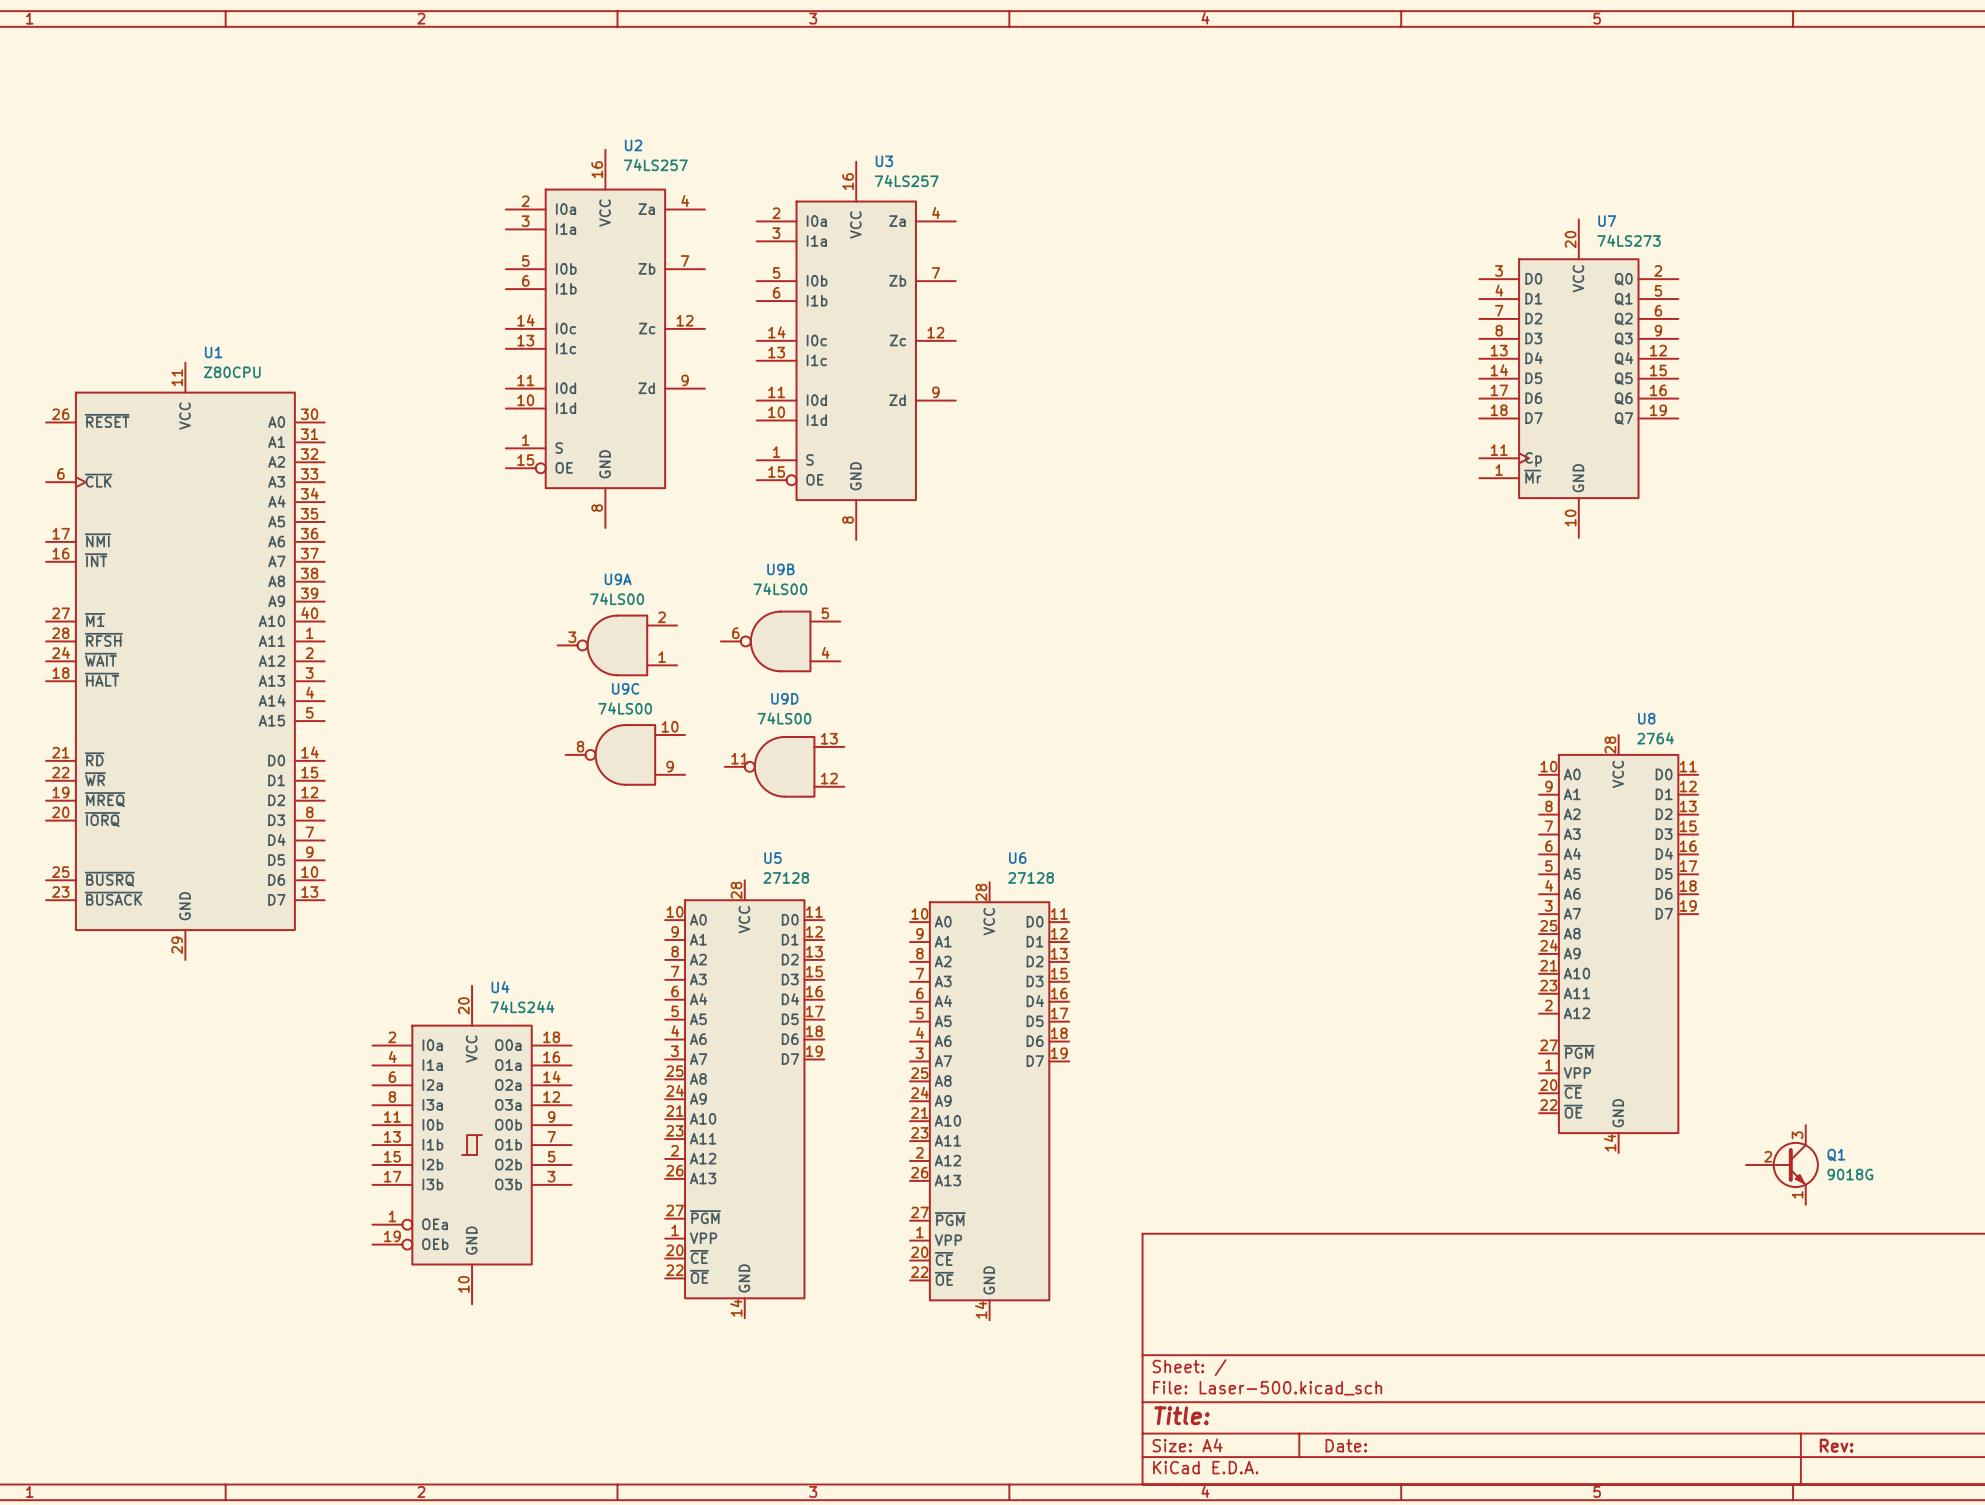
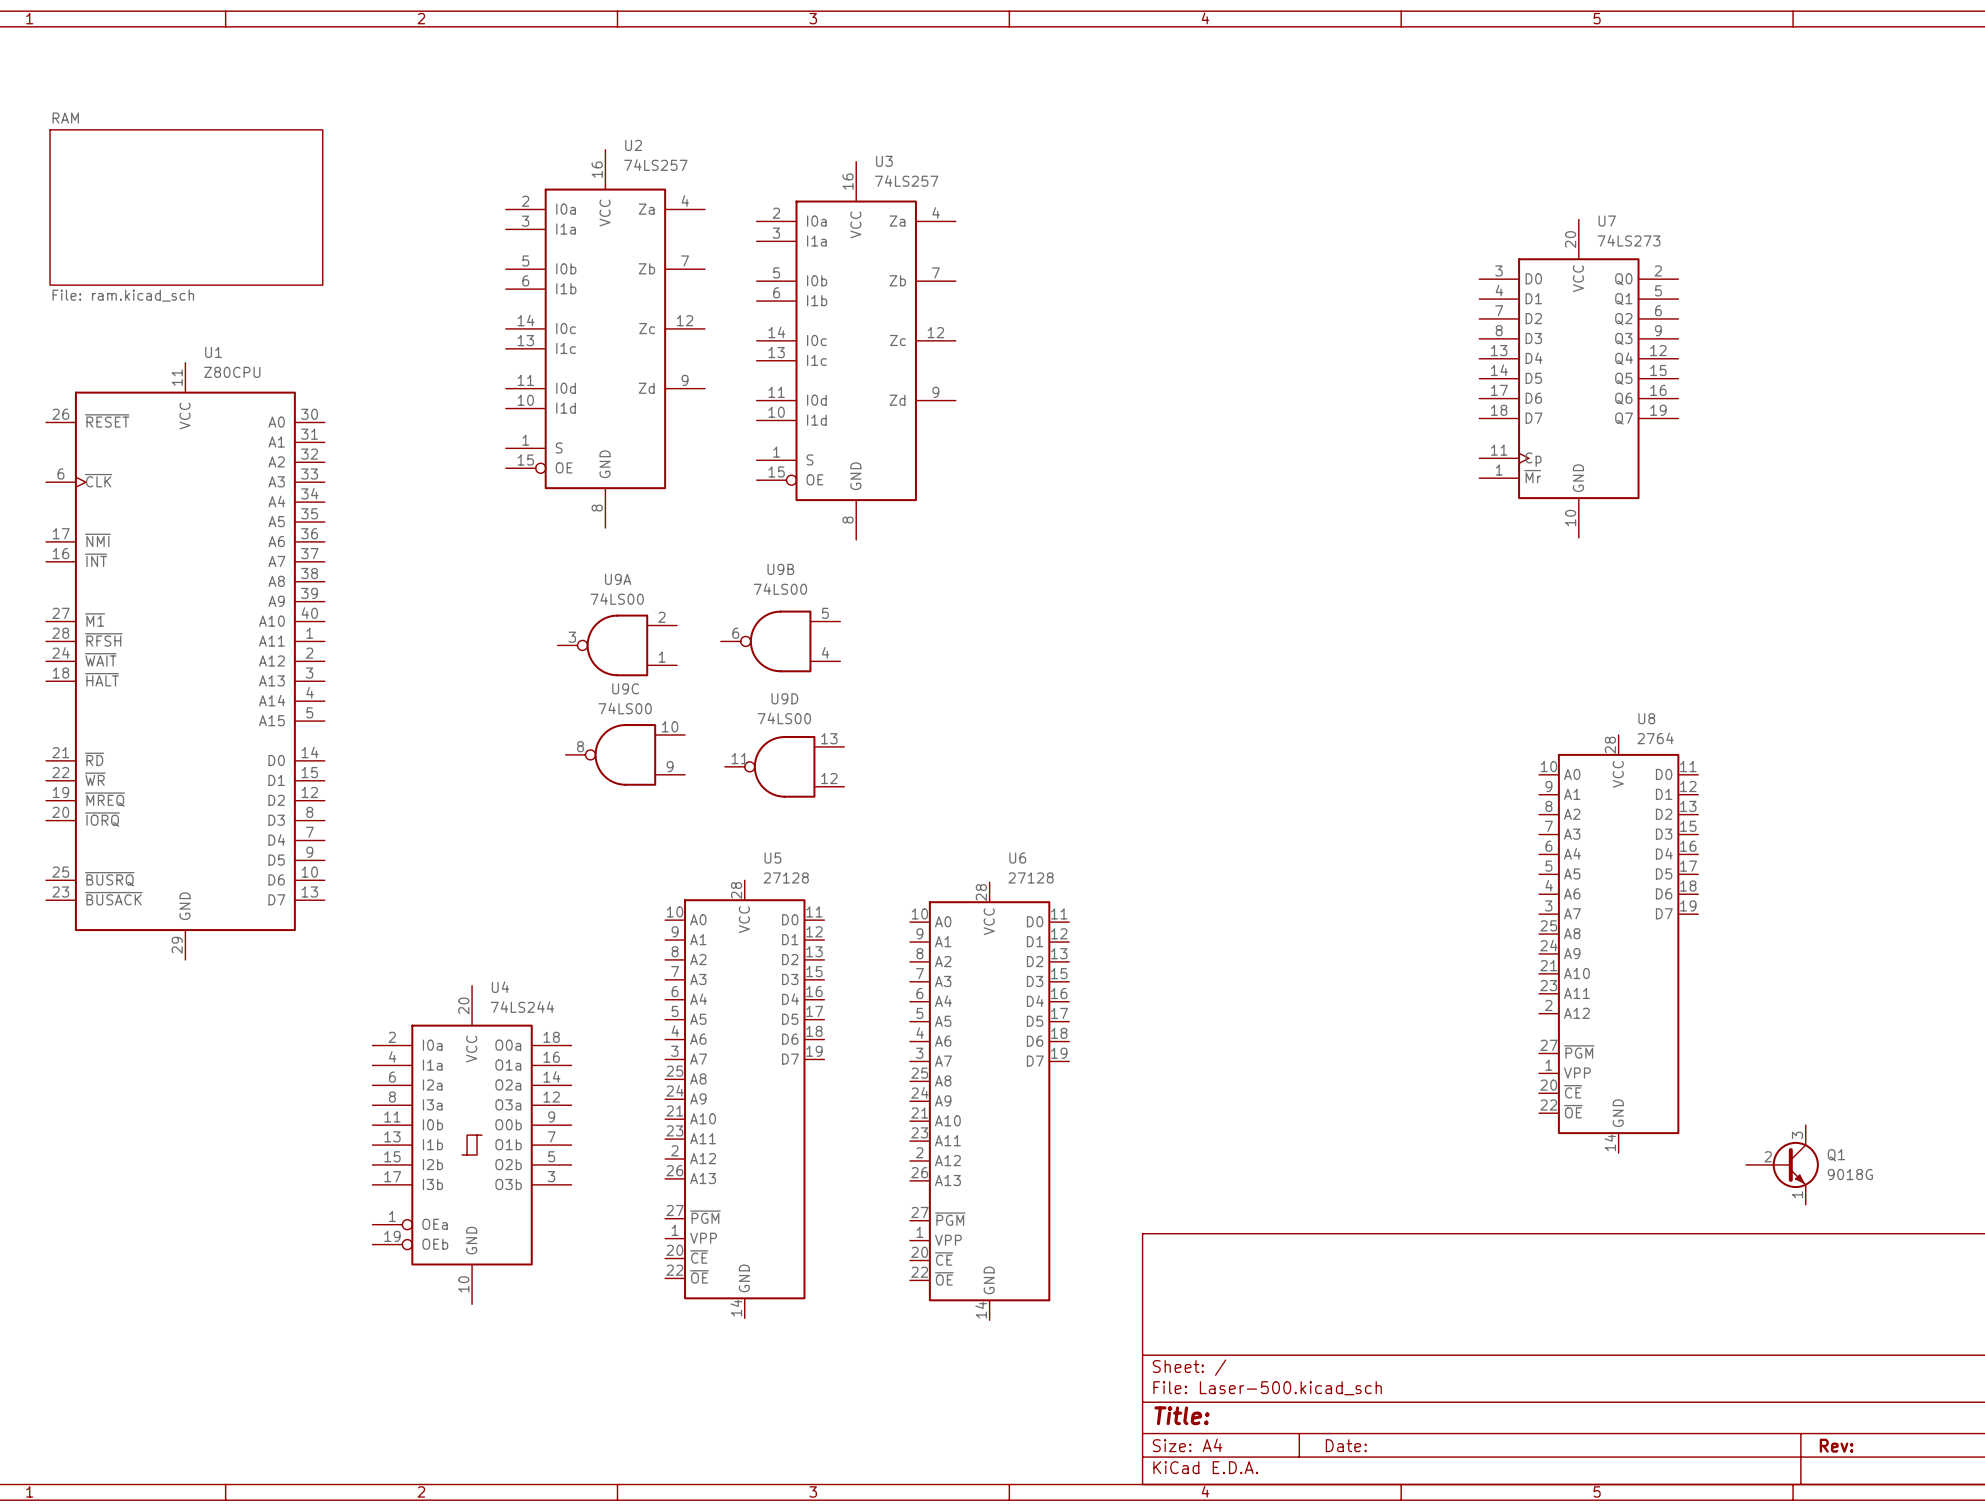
sheet RAM: none -> File: ram.kicad_sch (186, 207)

